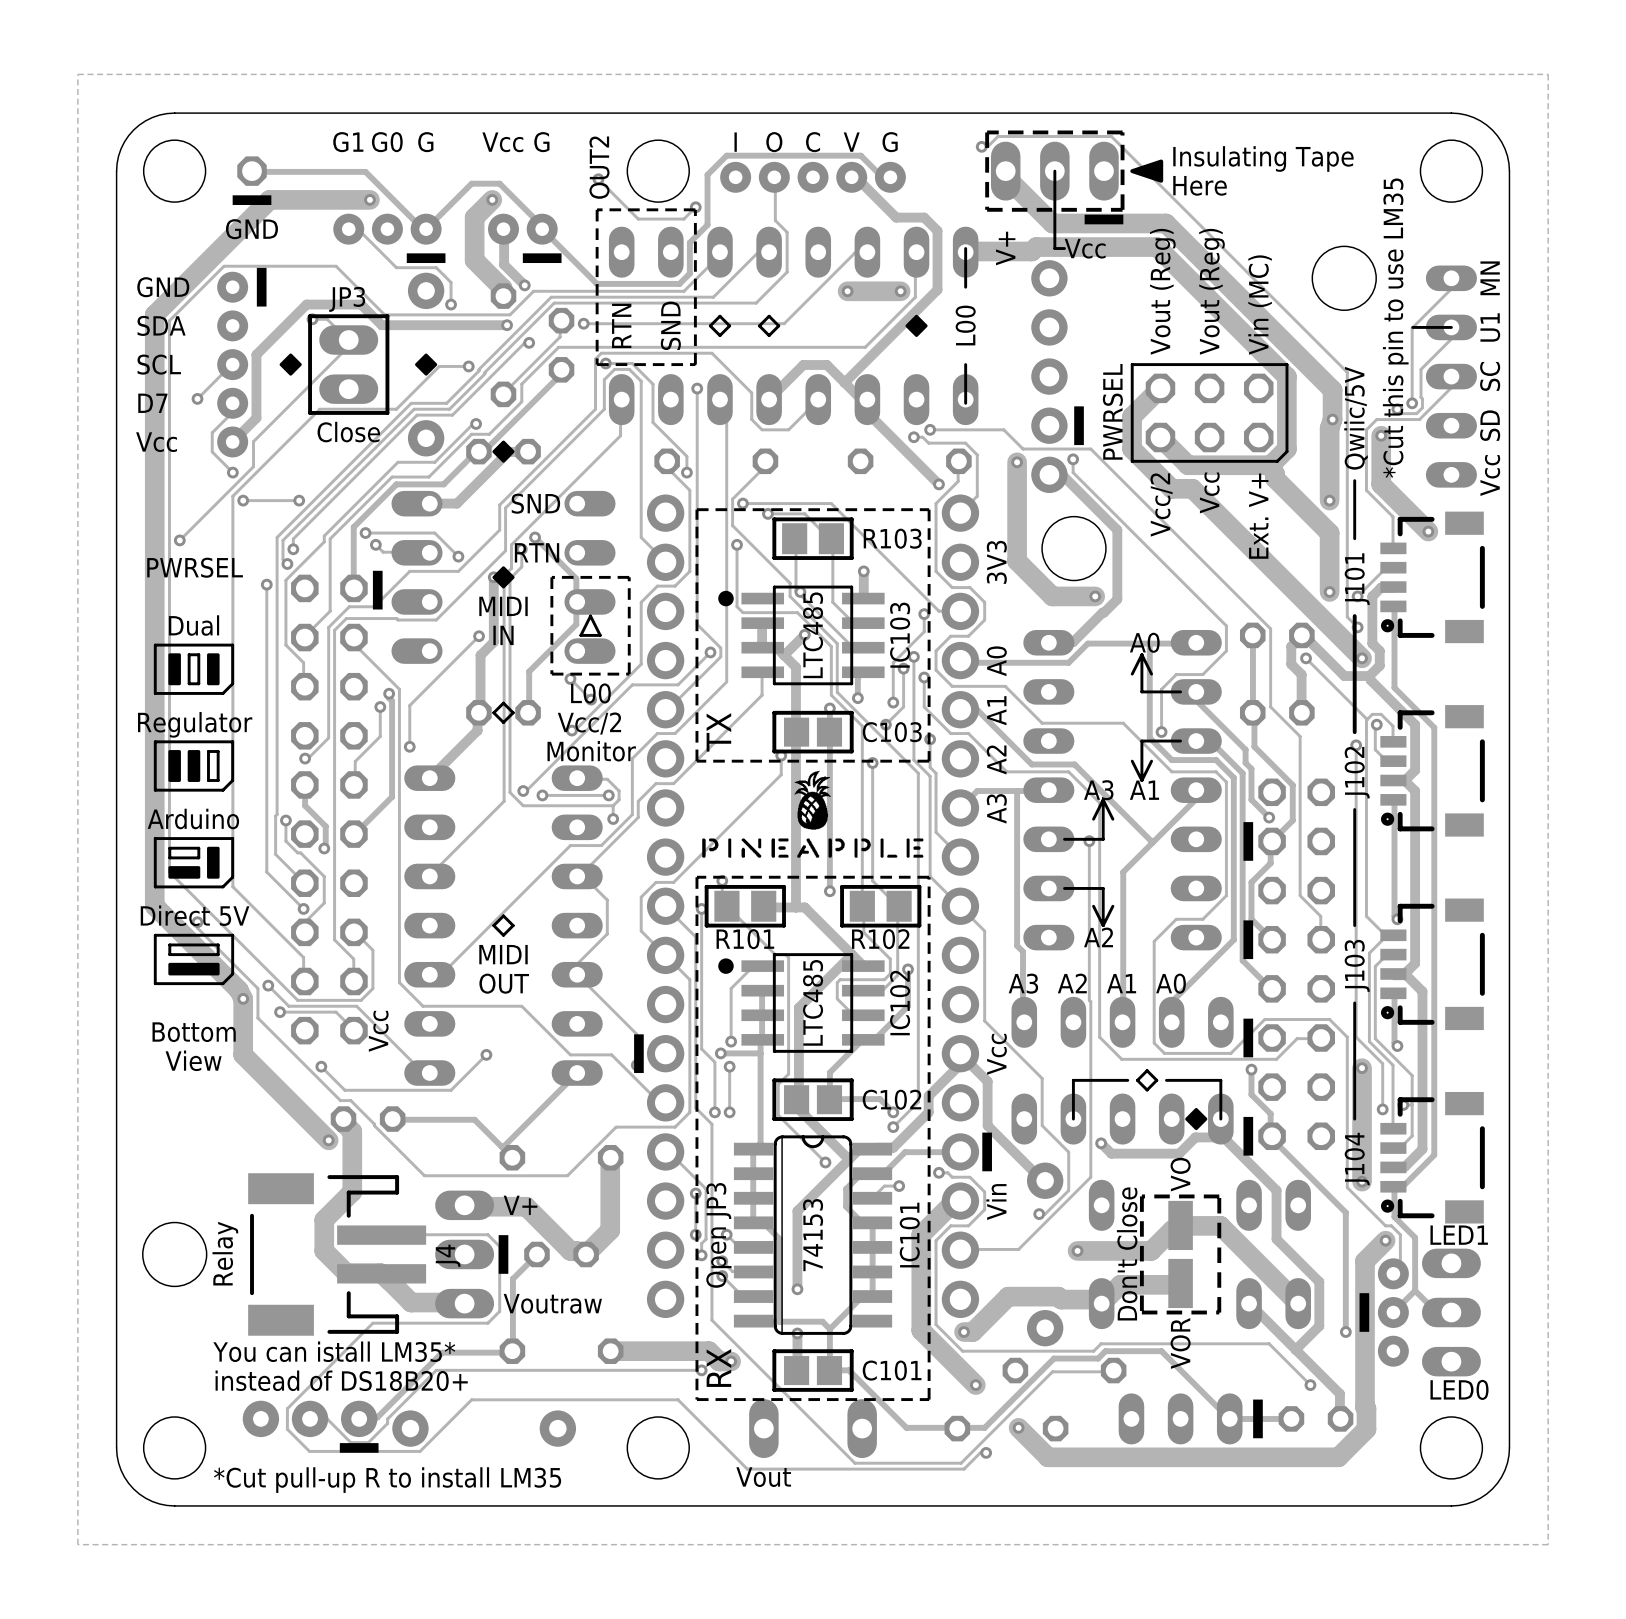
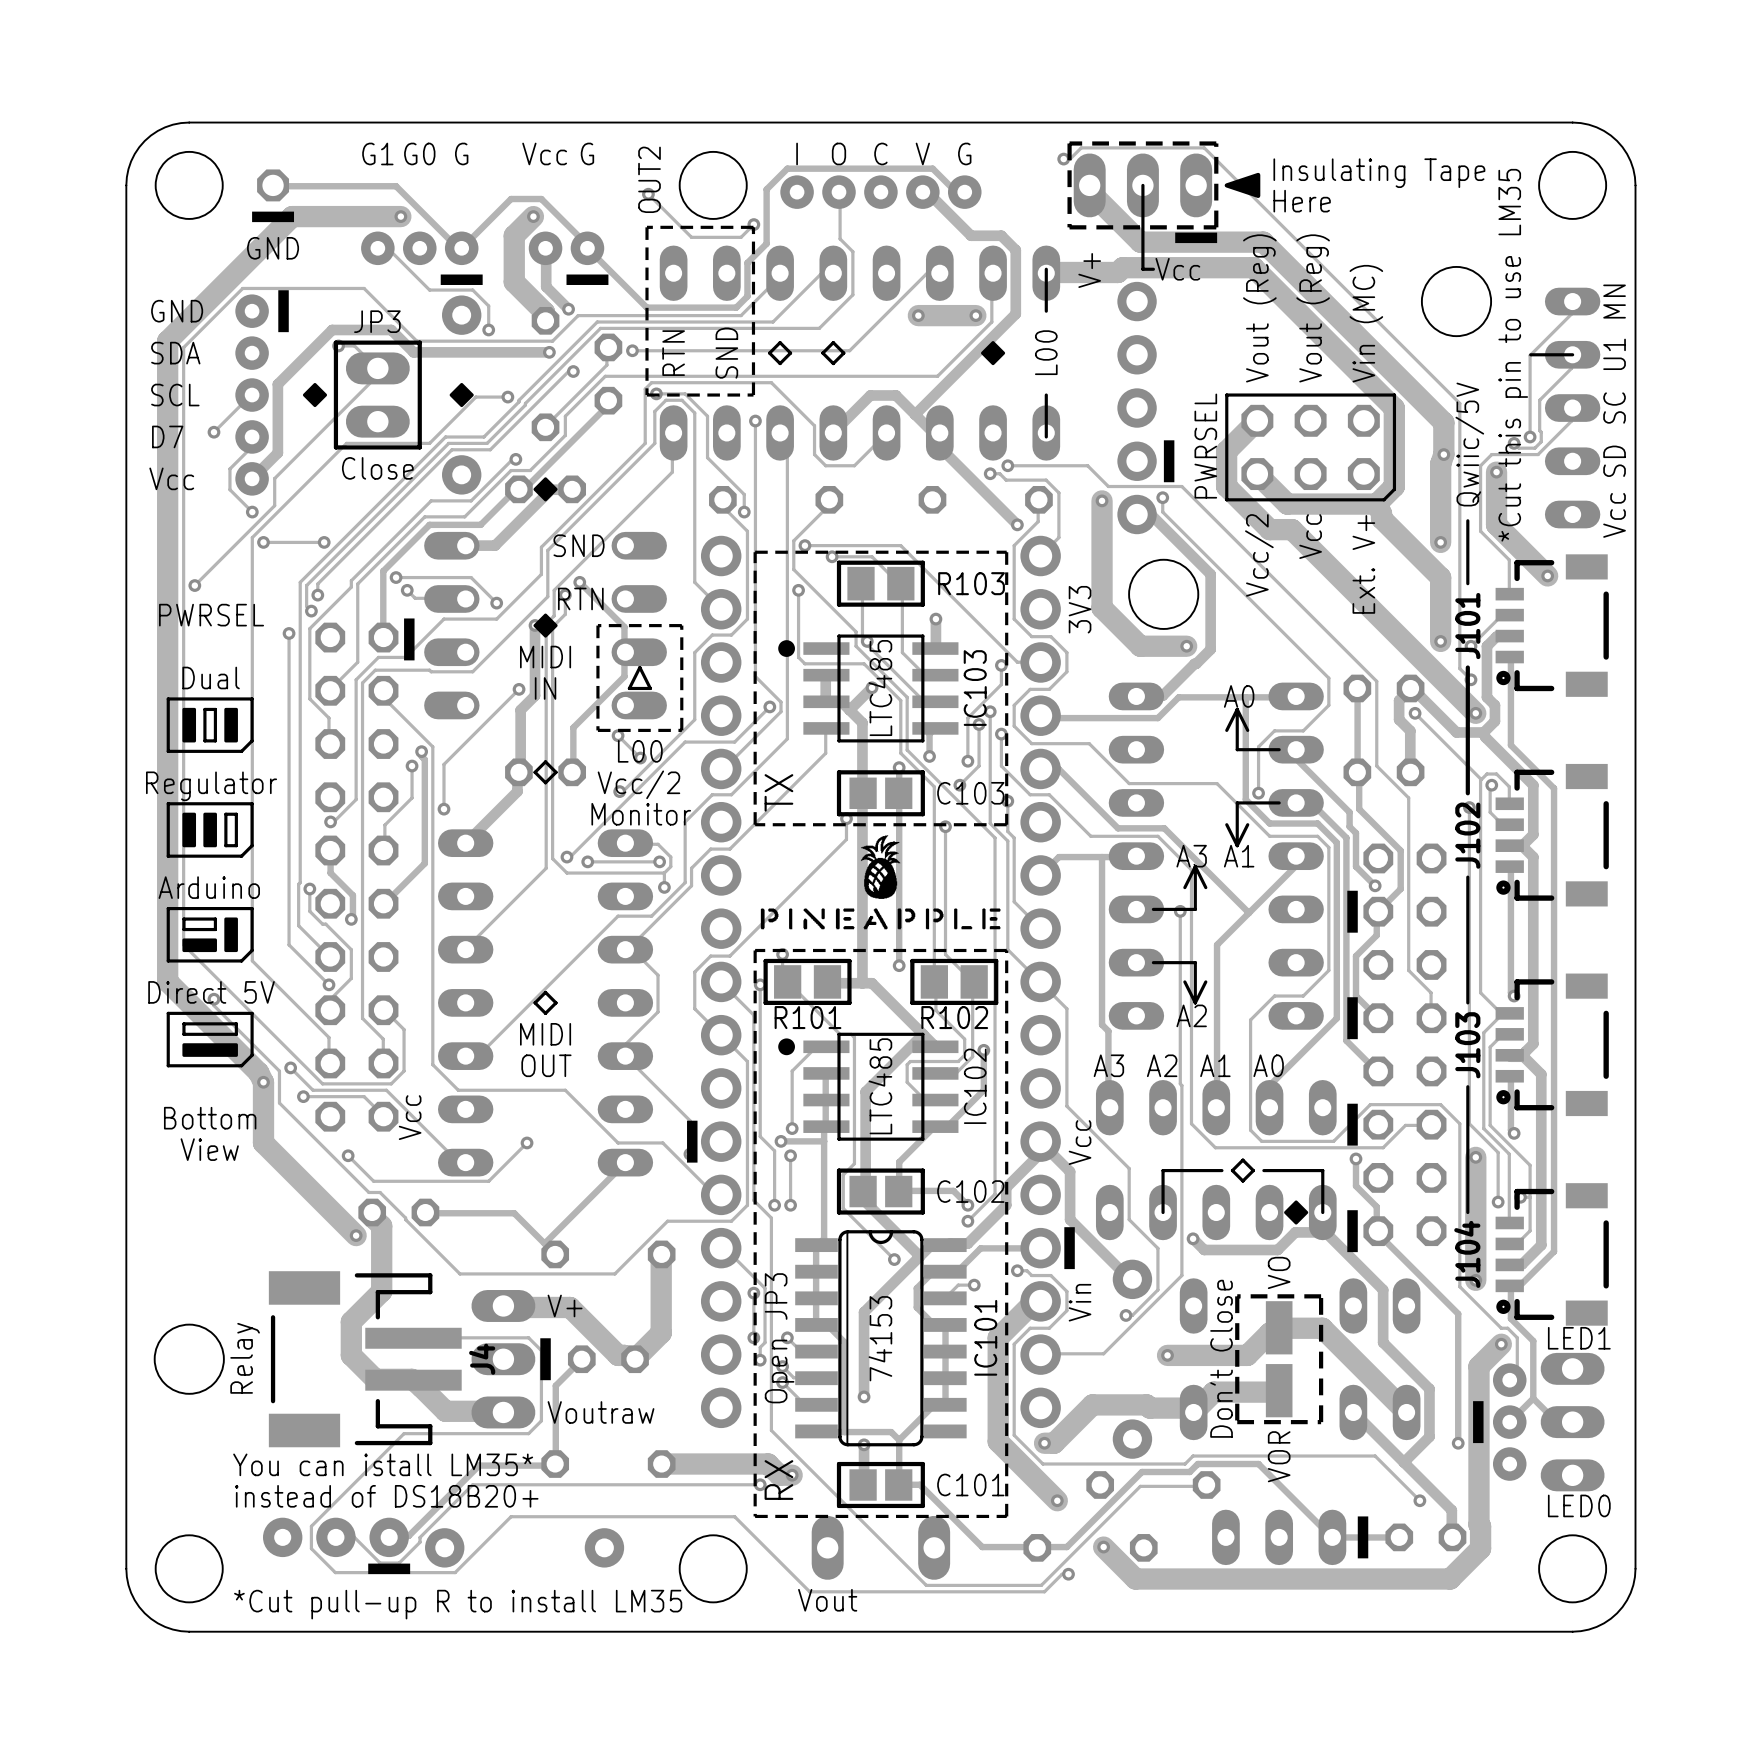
zone outline: (1548, 74) (77, 74) (77, 1544) (1548, 1544) (1548, 74) -> none
text: A0 (996, 661) -> none
text: A1 (996, 710) -> none
text: A2 (996, 759) -> none
text: A3 (996, 808) -> none

